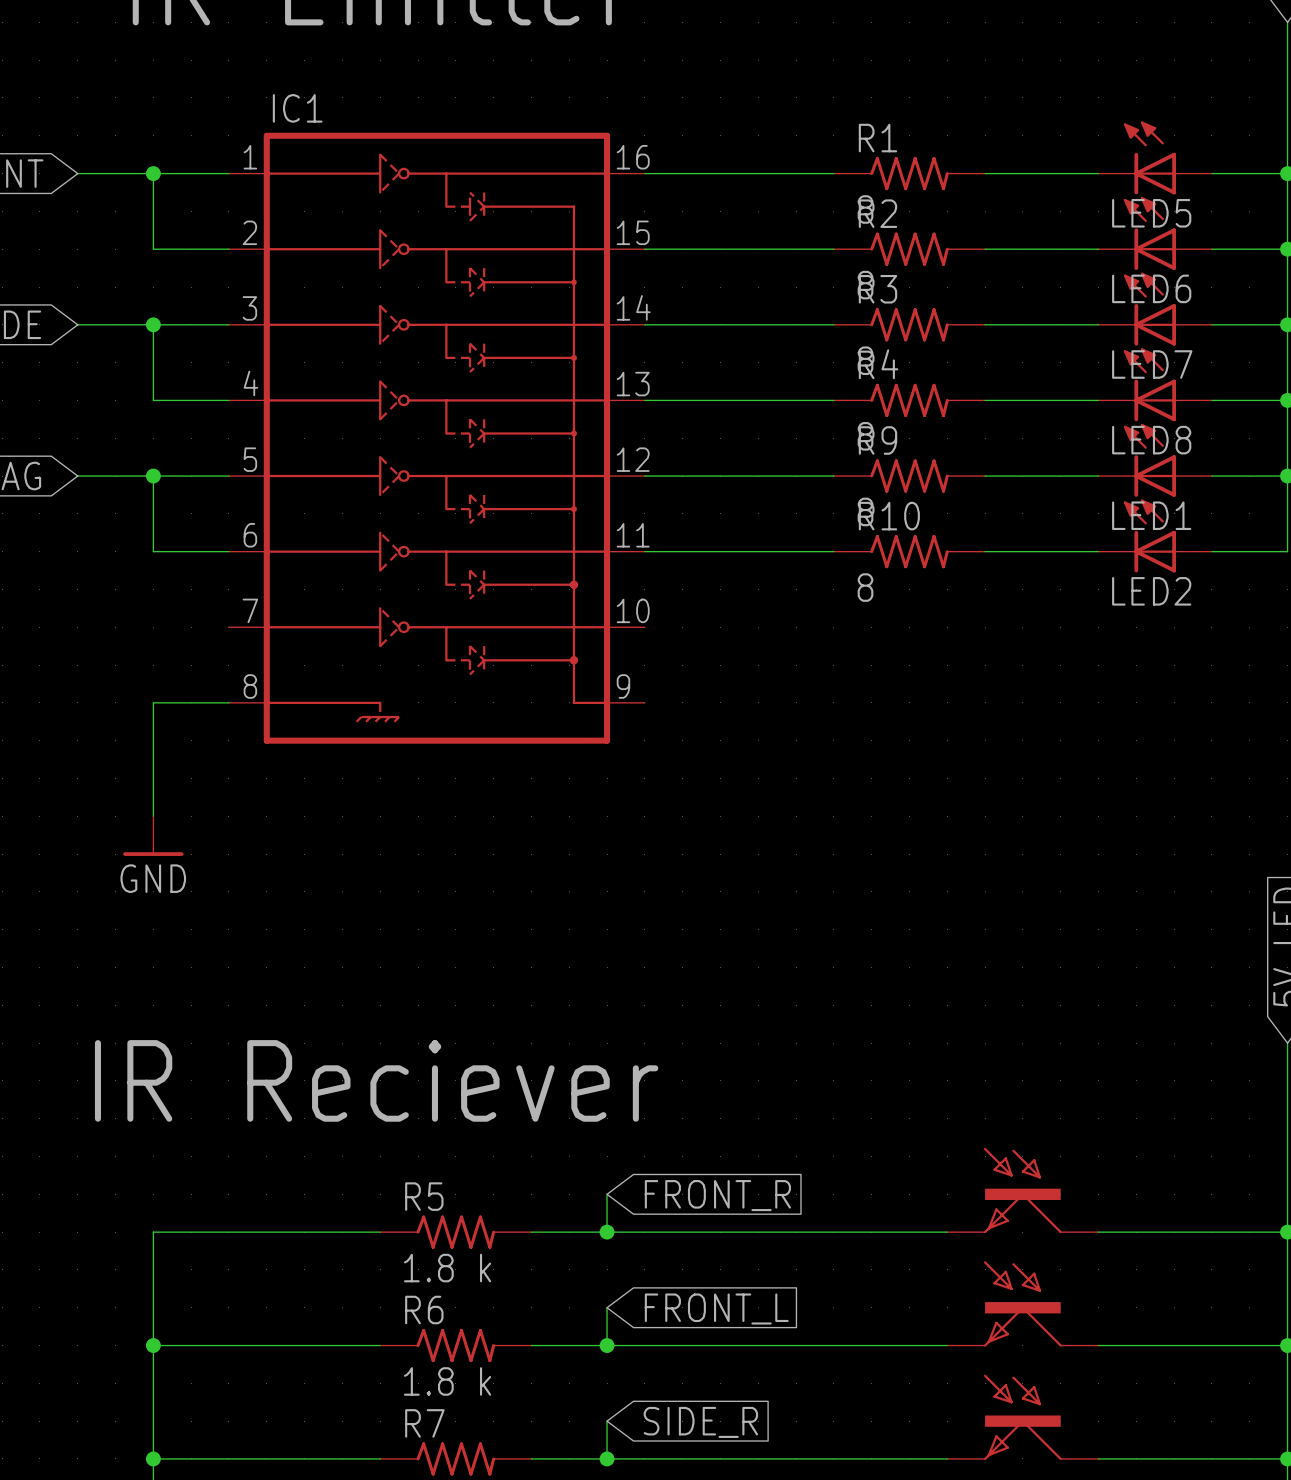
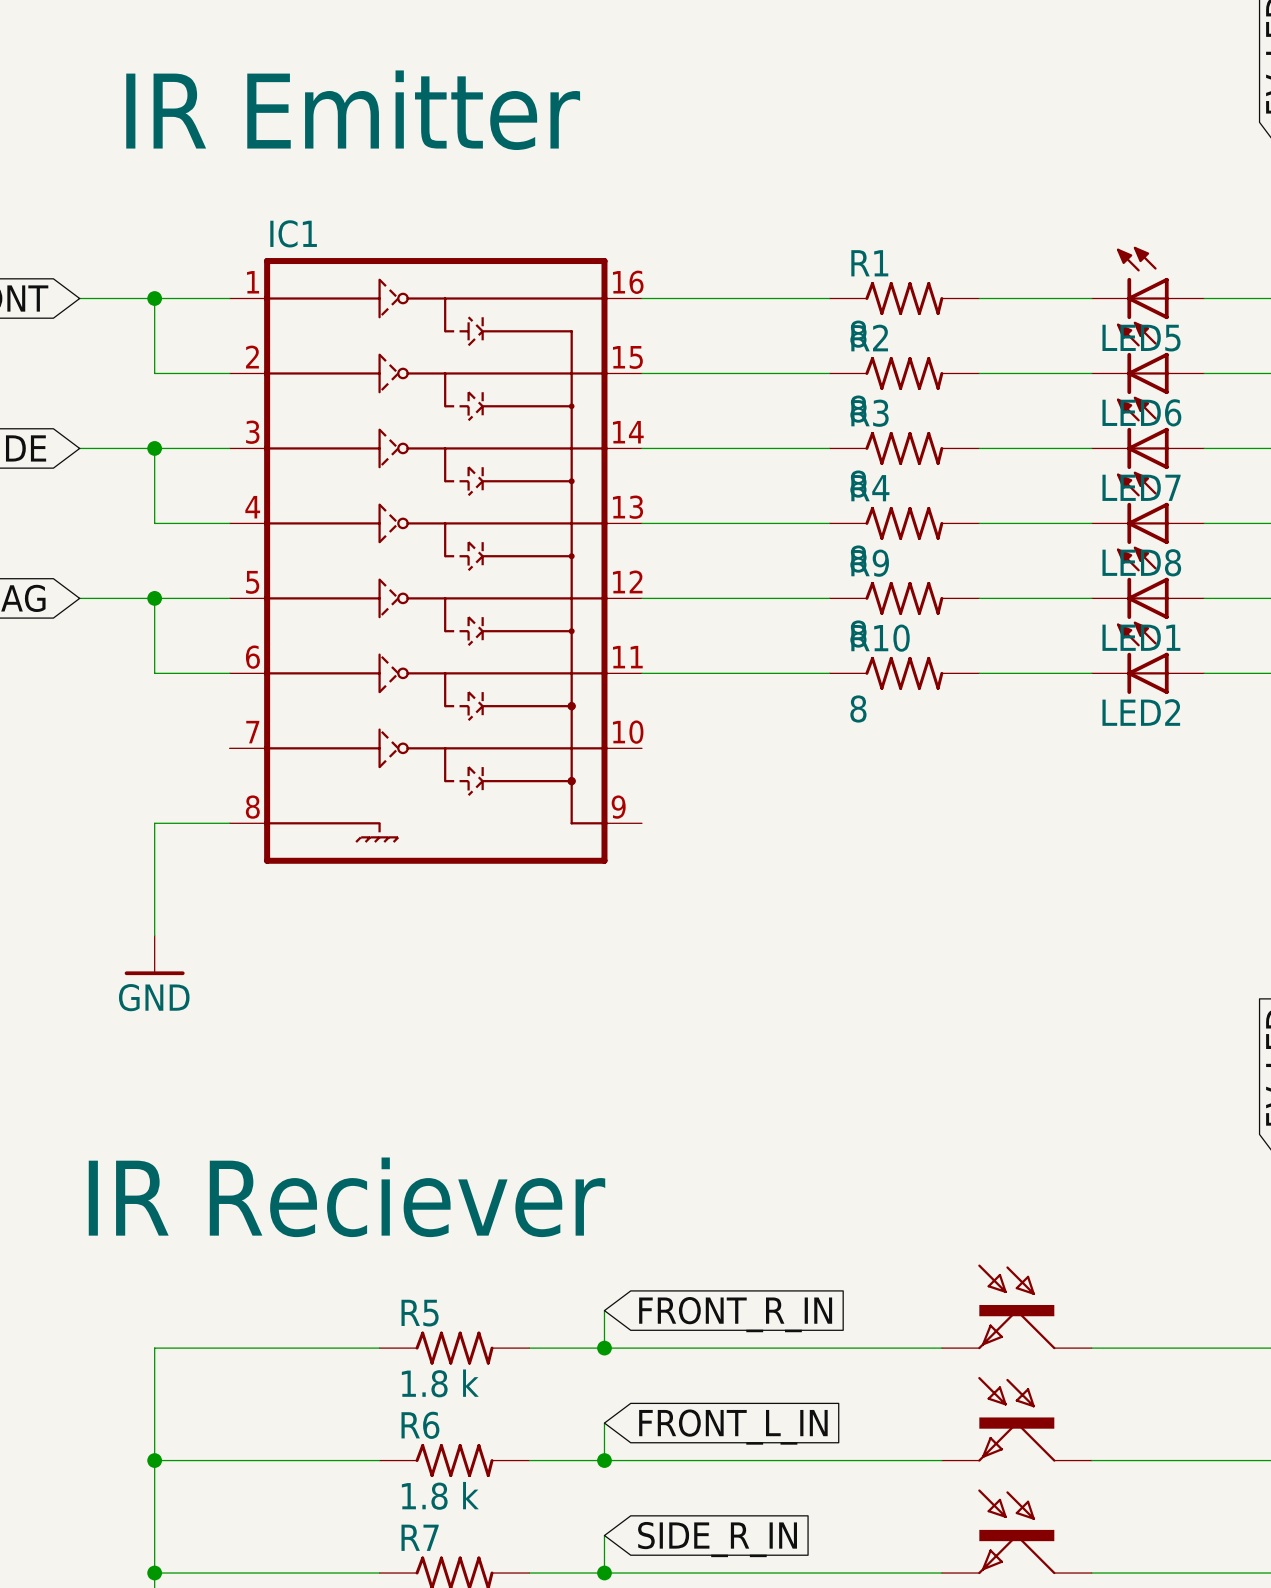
global label: FRONT_R (717, 1195) -> FRONT_R_IN (735, 1314)
global label: FRONT_L (716, 1309) -> FRONT_L_IN (733, 1427)
global label: SIDE_R (700, 1422) -> SIDE_R_IN (717, 1539)

